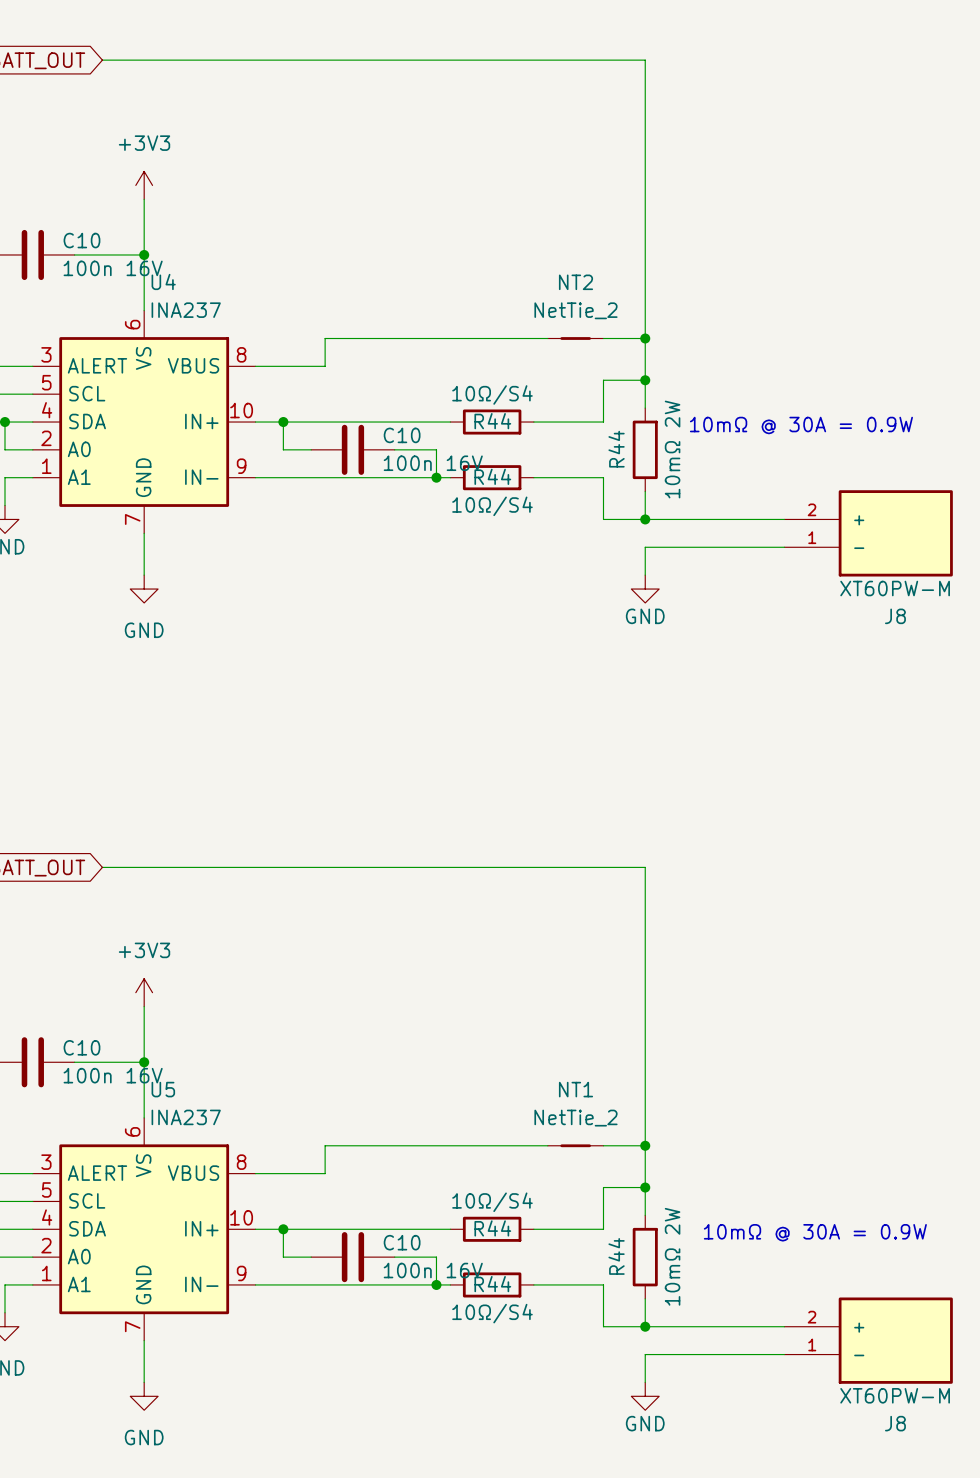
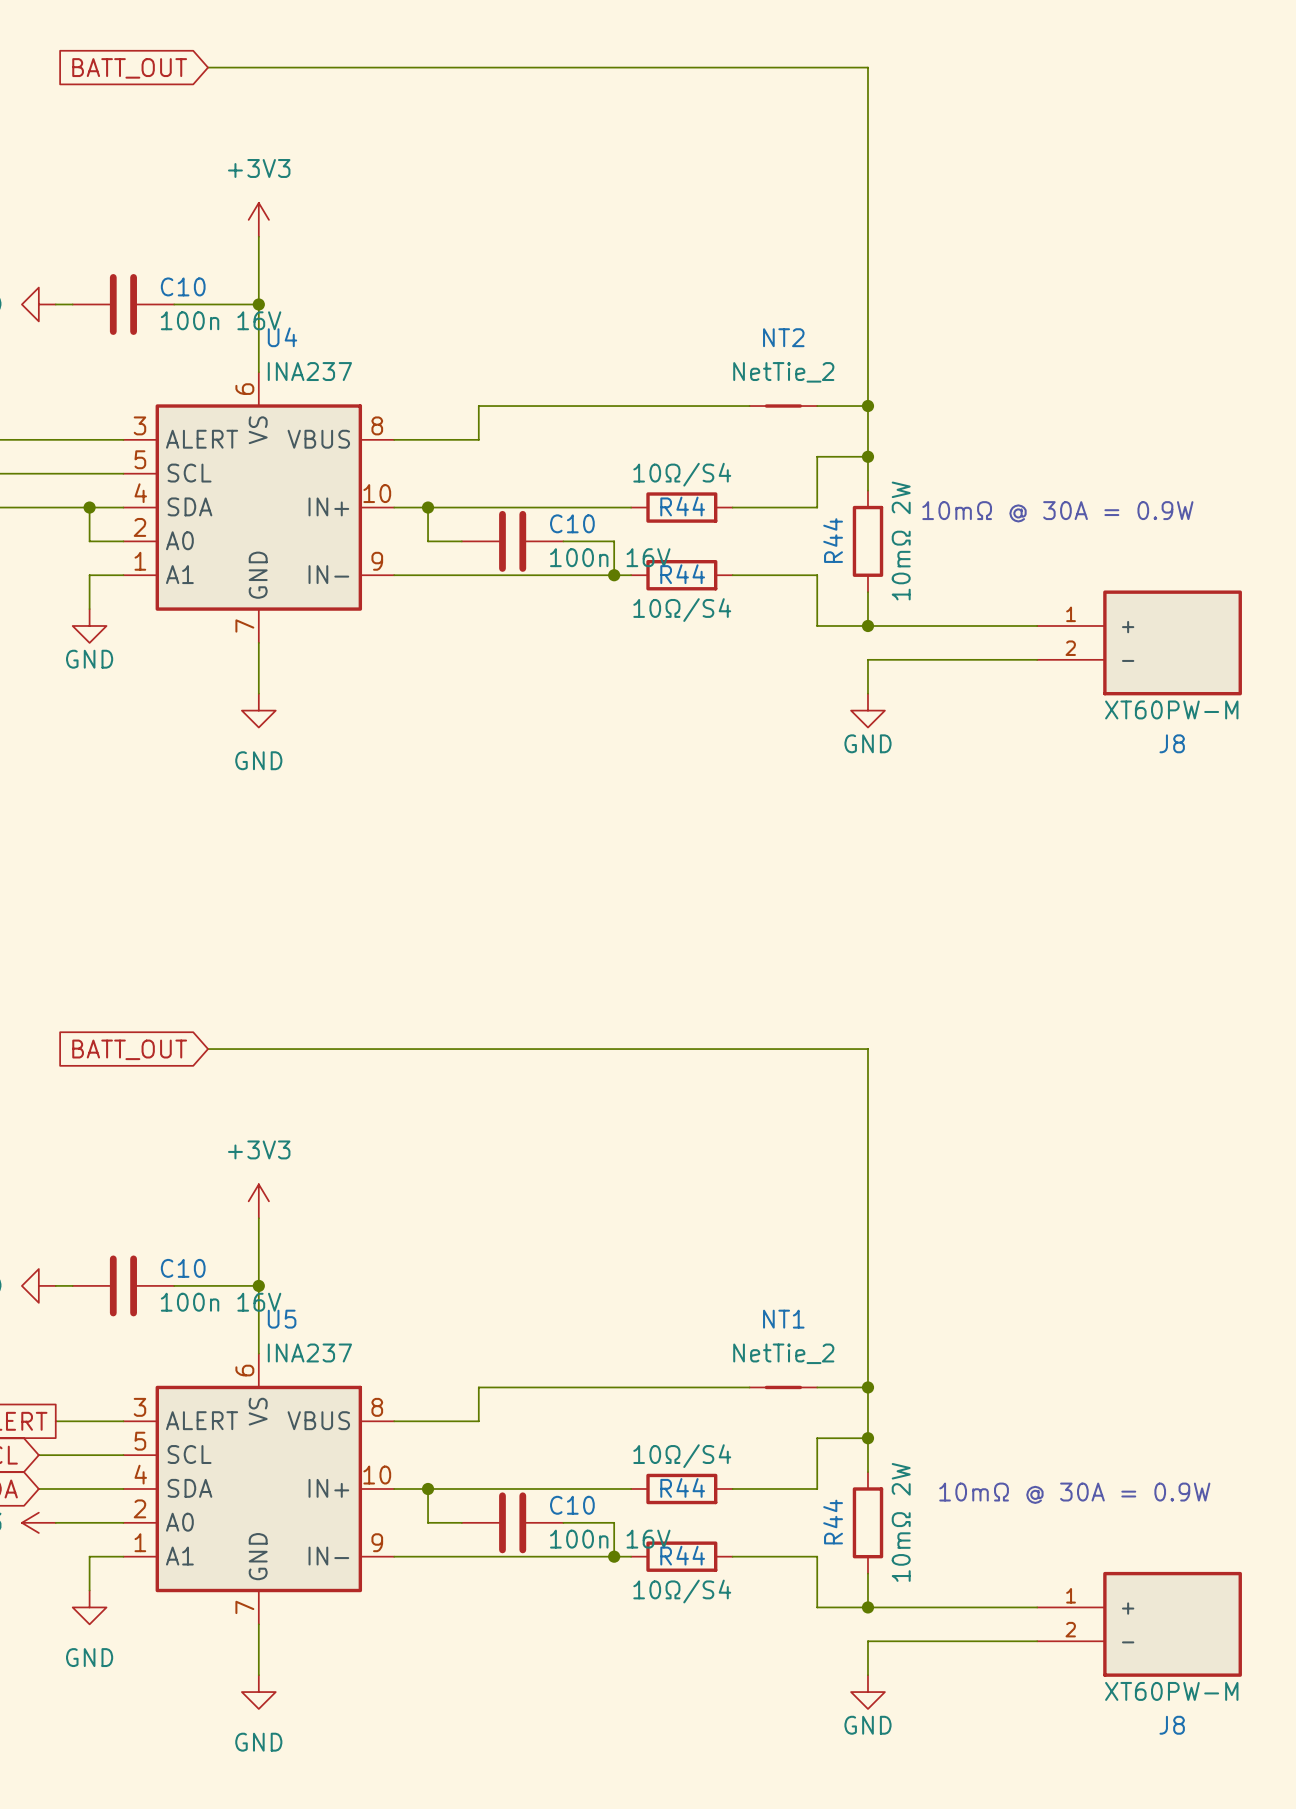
J8 pin number: 2 (812, 509) -> 1 (1071, 614)
J8 pin number: 1 (812, 537) -> 2 (1070, 648)
J8 pin number: 2 (812, 1317) -> 1 (1071, 1595)
J8 pin number: 1 (812, 1344) -> 2 (1070, 1629)

